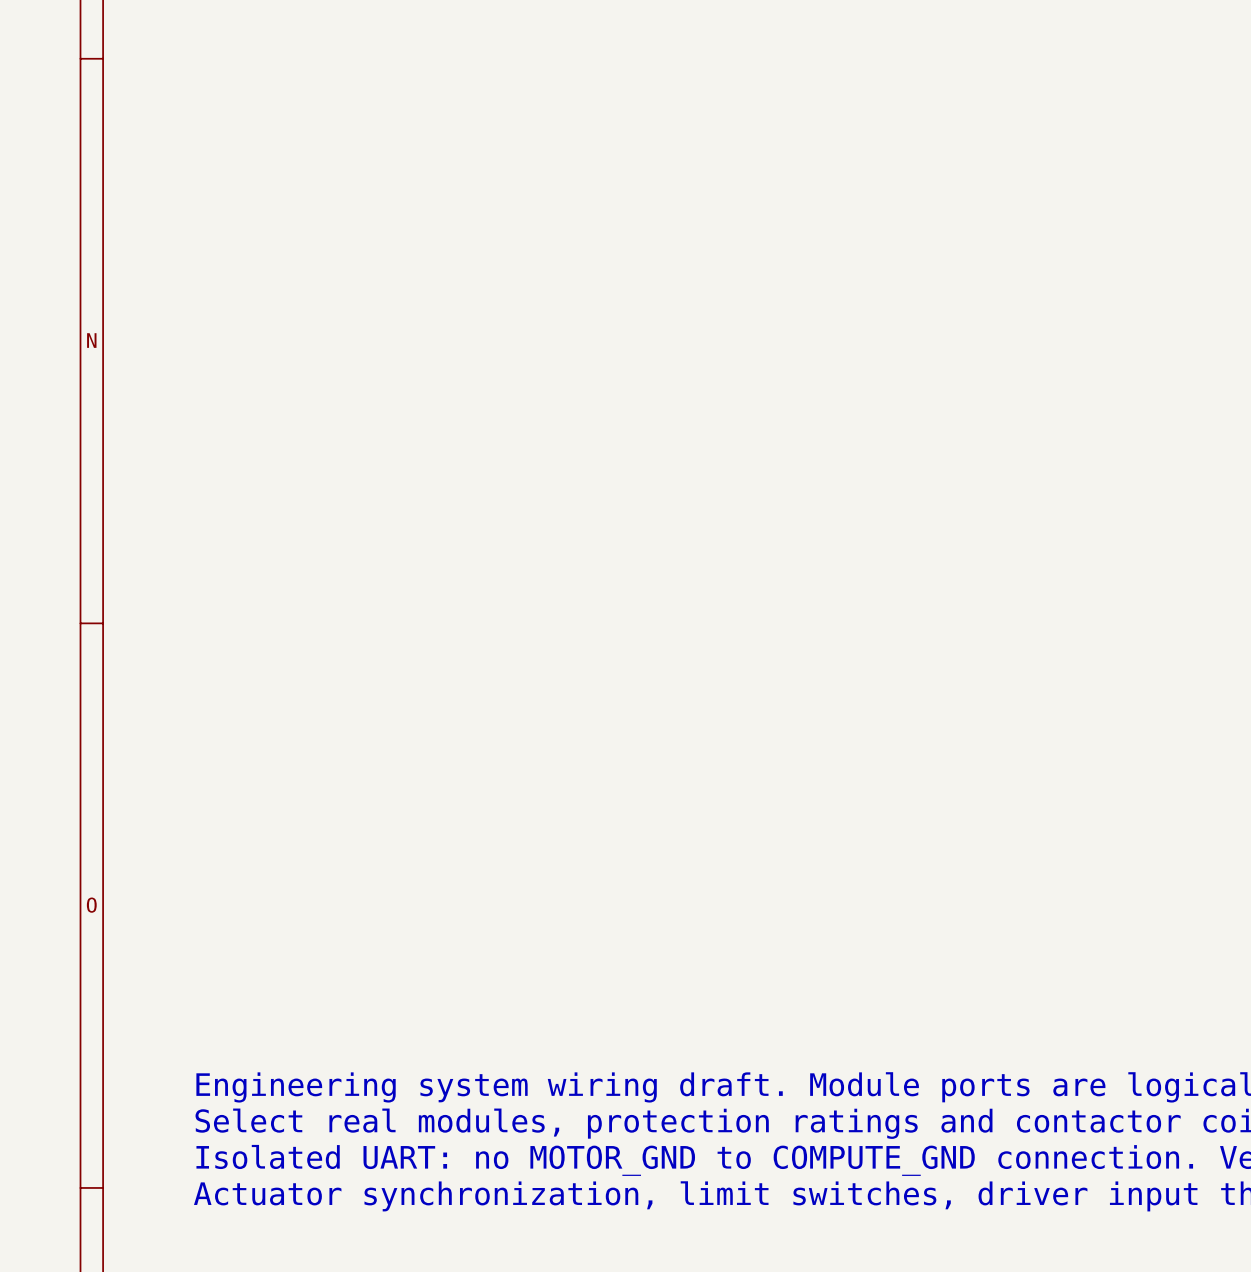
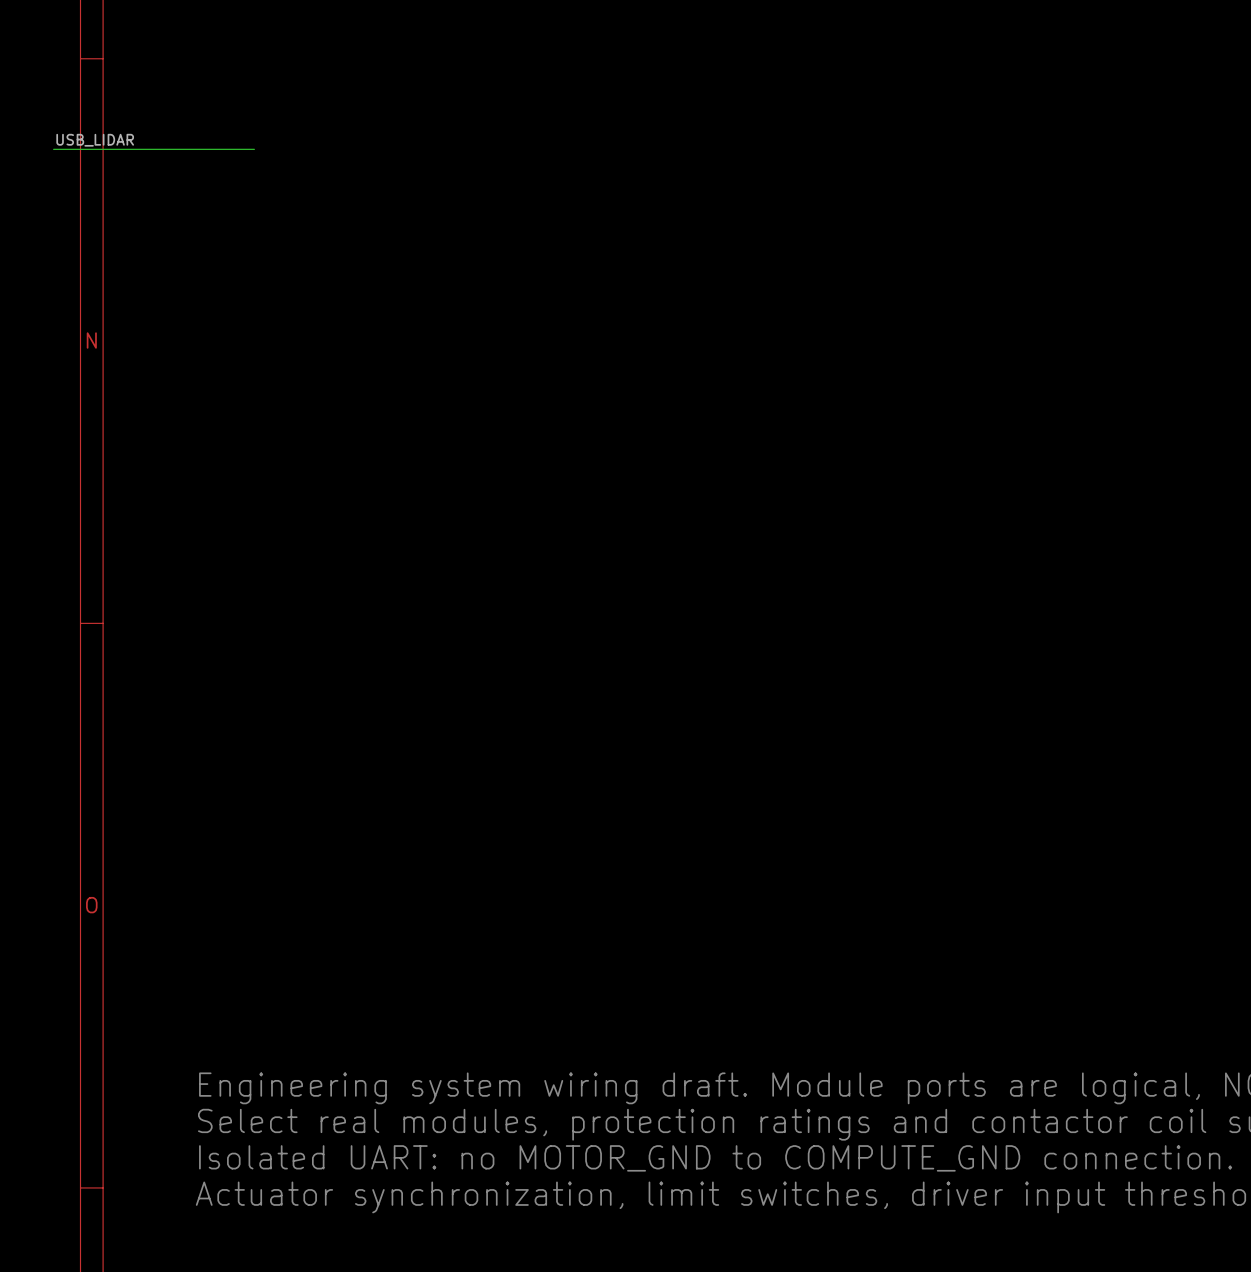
label: none -> USB_LIDAR (95, 140)
wire: none -> (53, 149) (254, 149)

